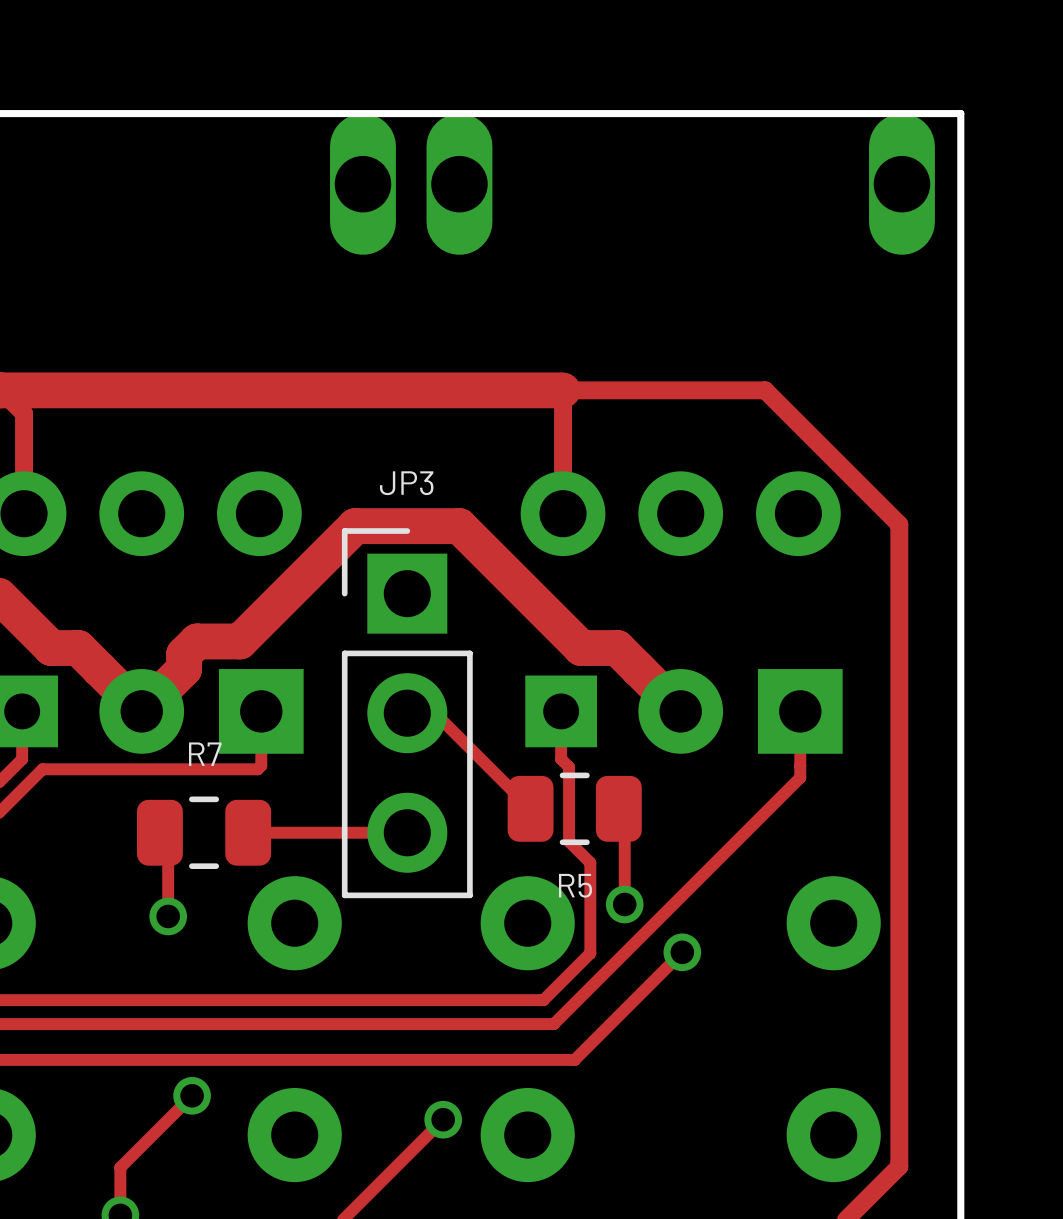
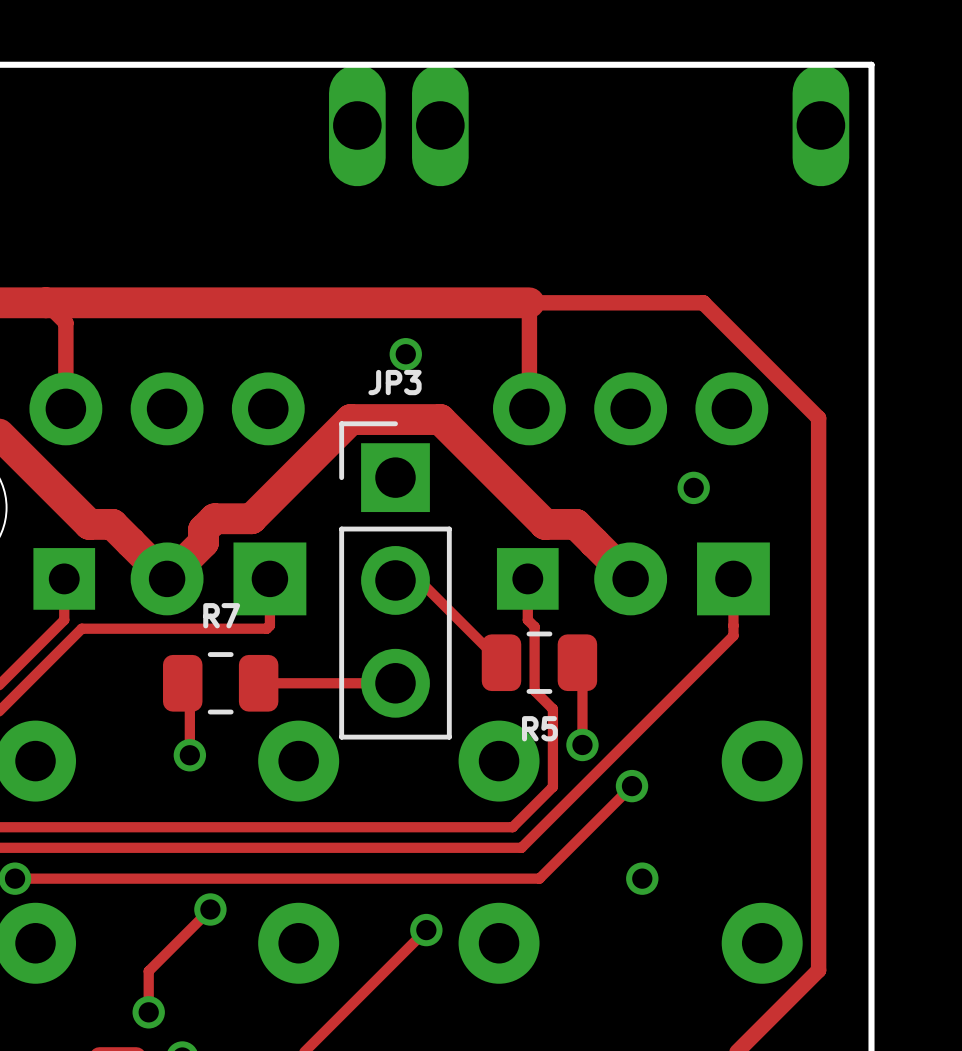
via: none -> (405, 354)
via: none -> (693, 487)
via: none -> (642, 878)

